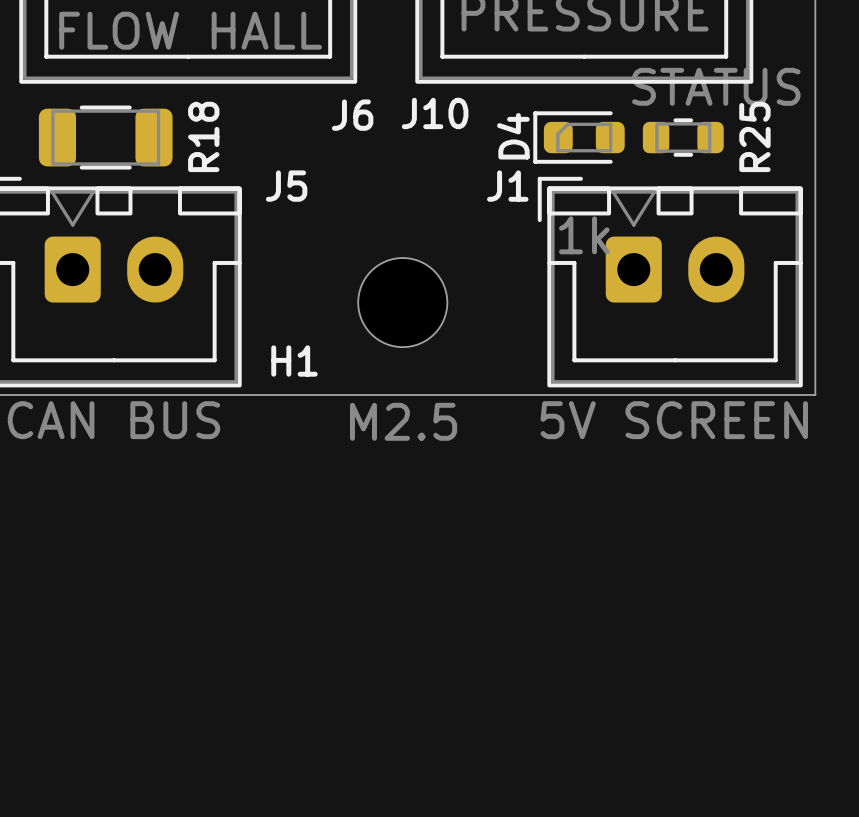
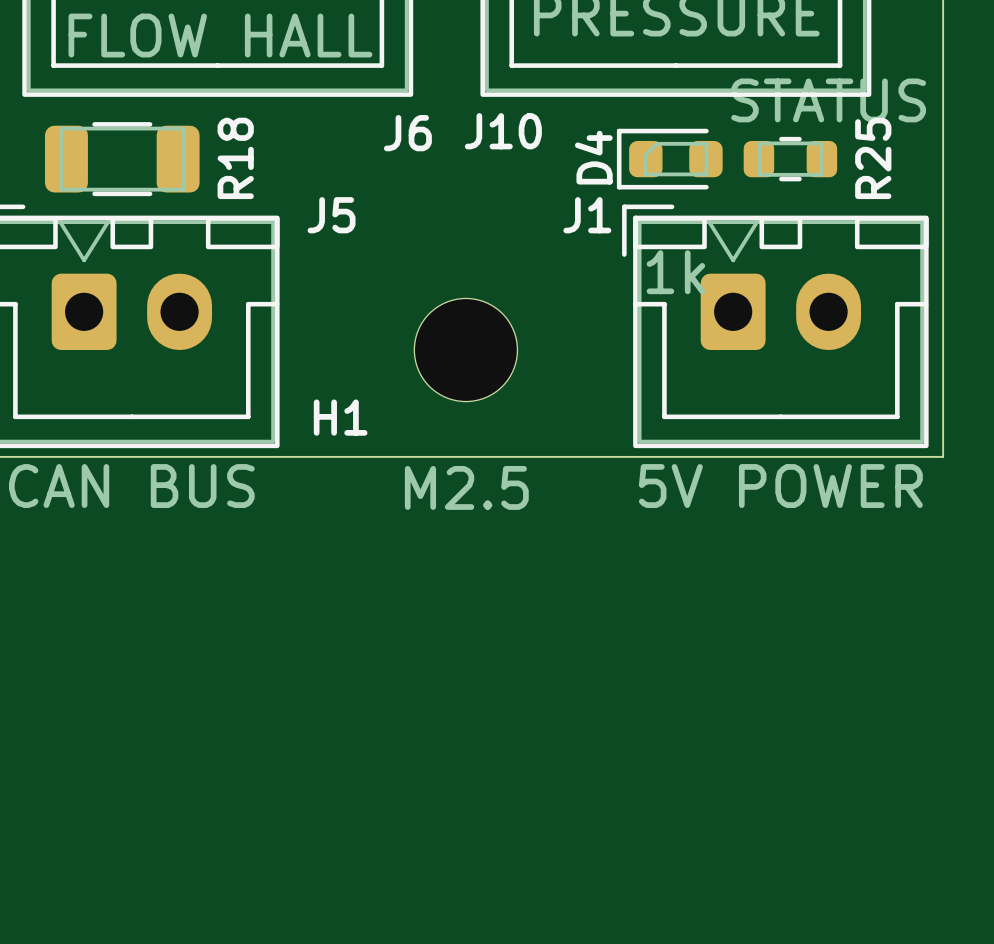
J1 value: 5V SCREEN (674, 420) -> 5V POWER (780, 486)

